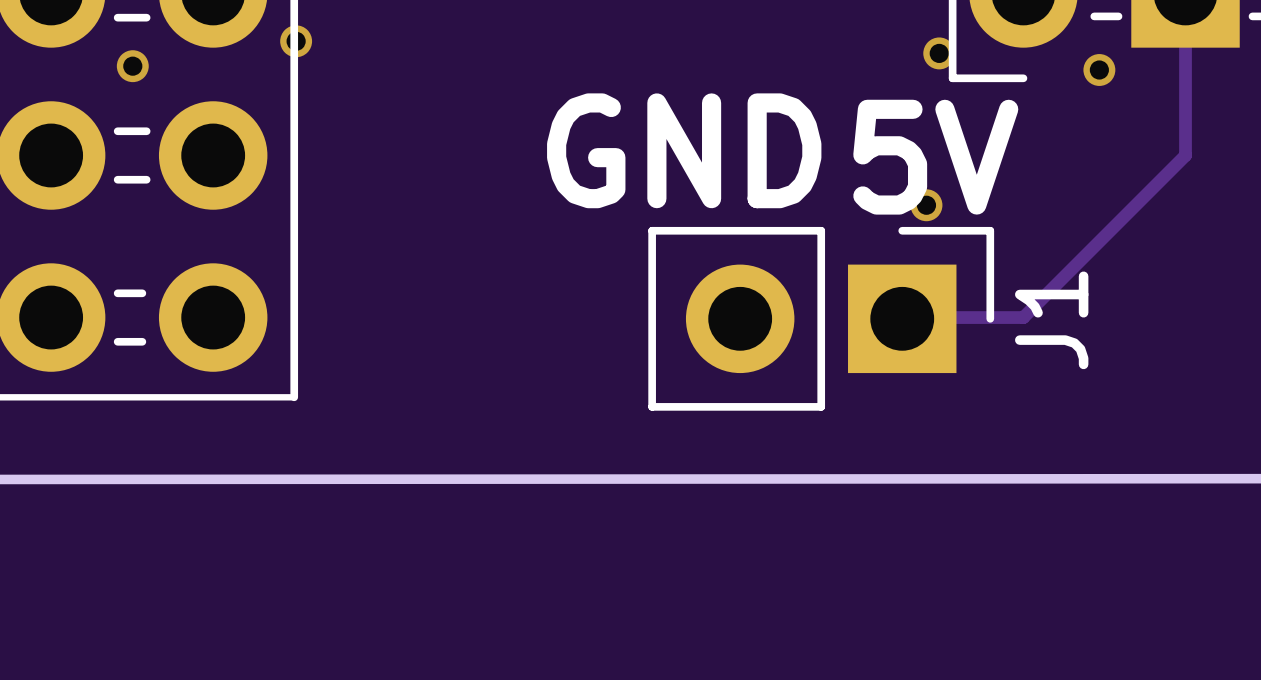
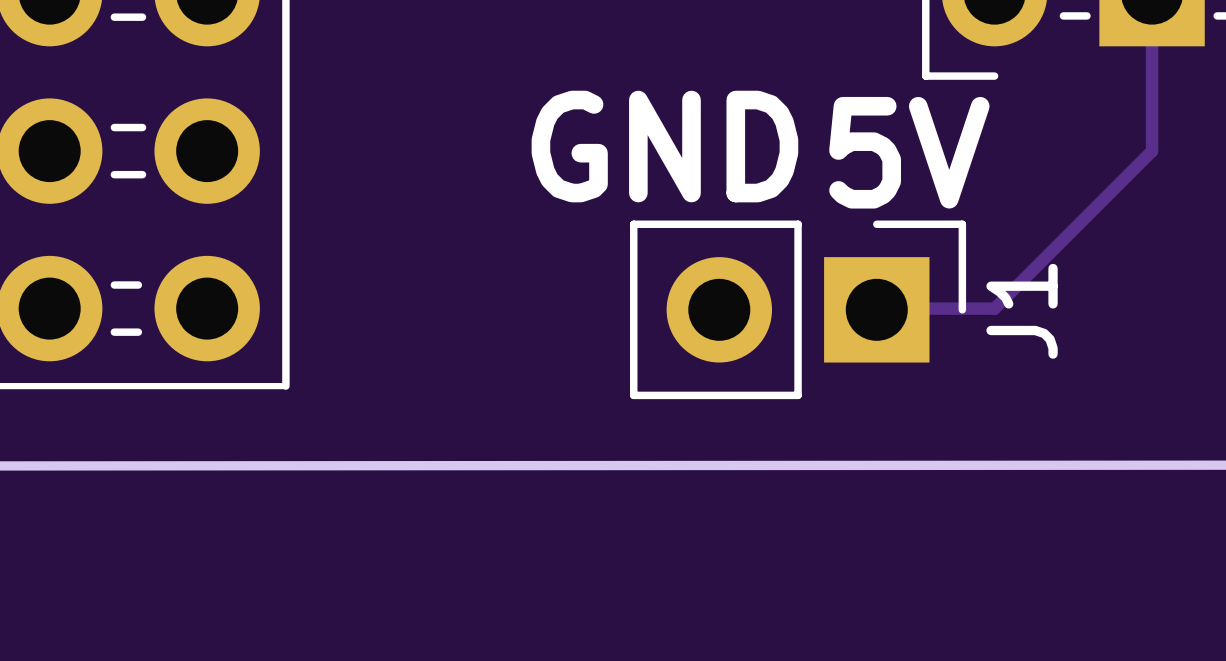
via: (296, 41) -> none
via: (939, 53) -> none
via: (132, 66) -> none
via: (1099, 70) -> none
via: (926, 205) -> none

